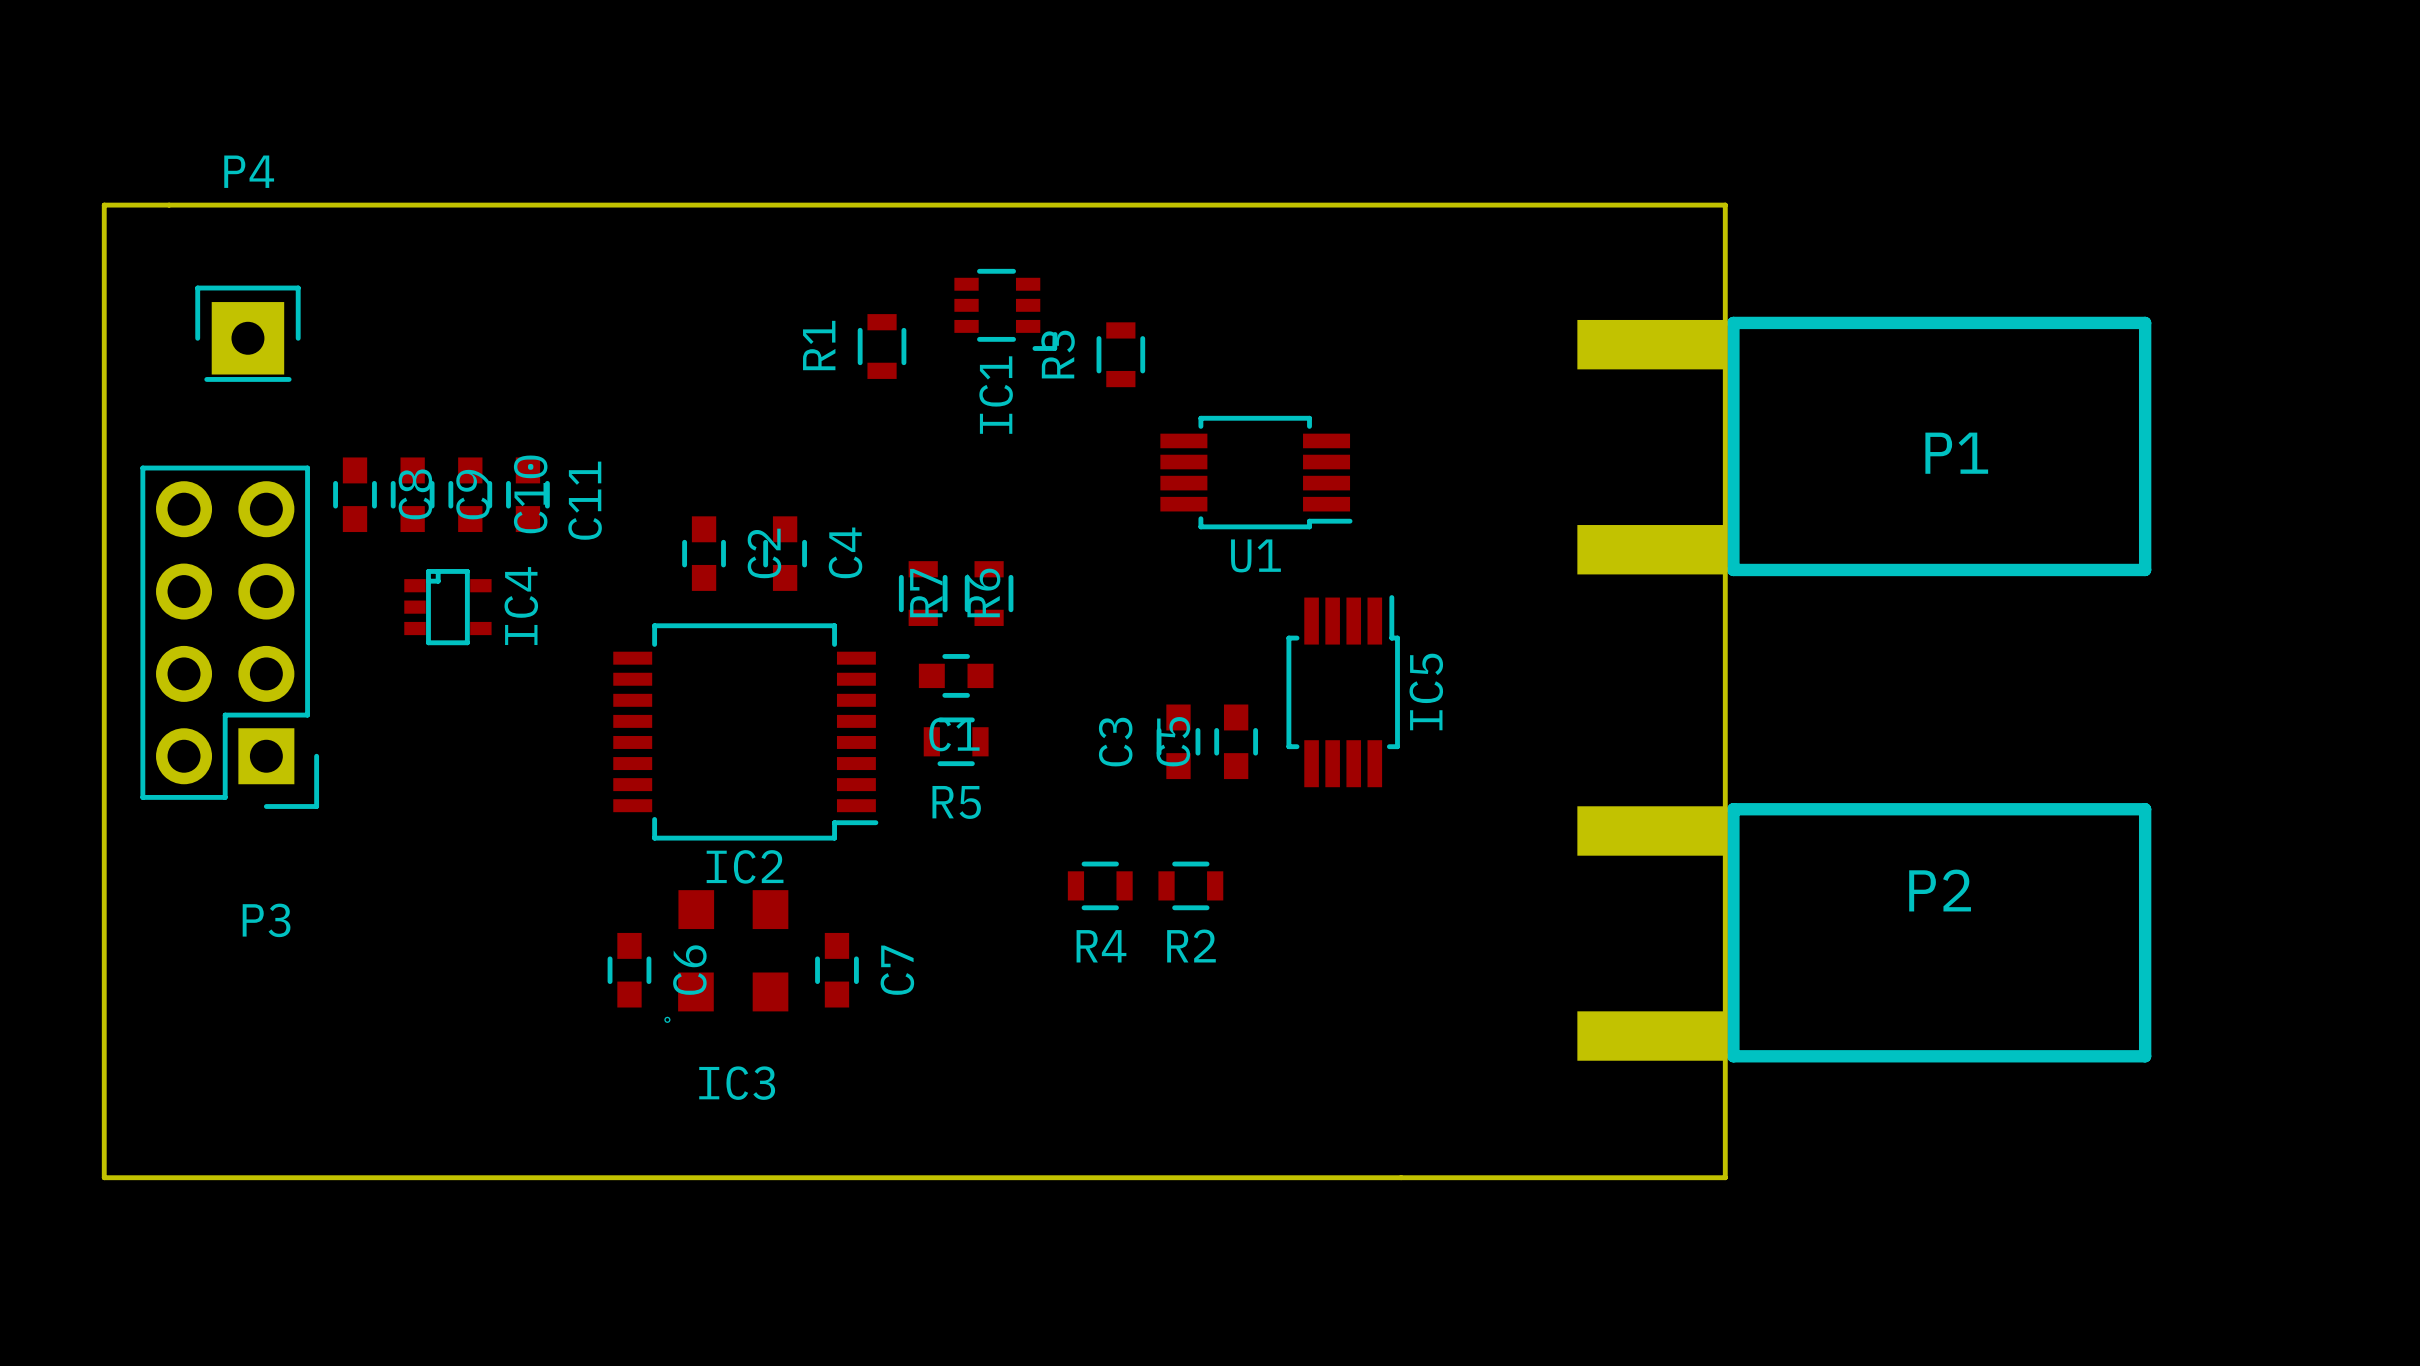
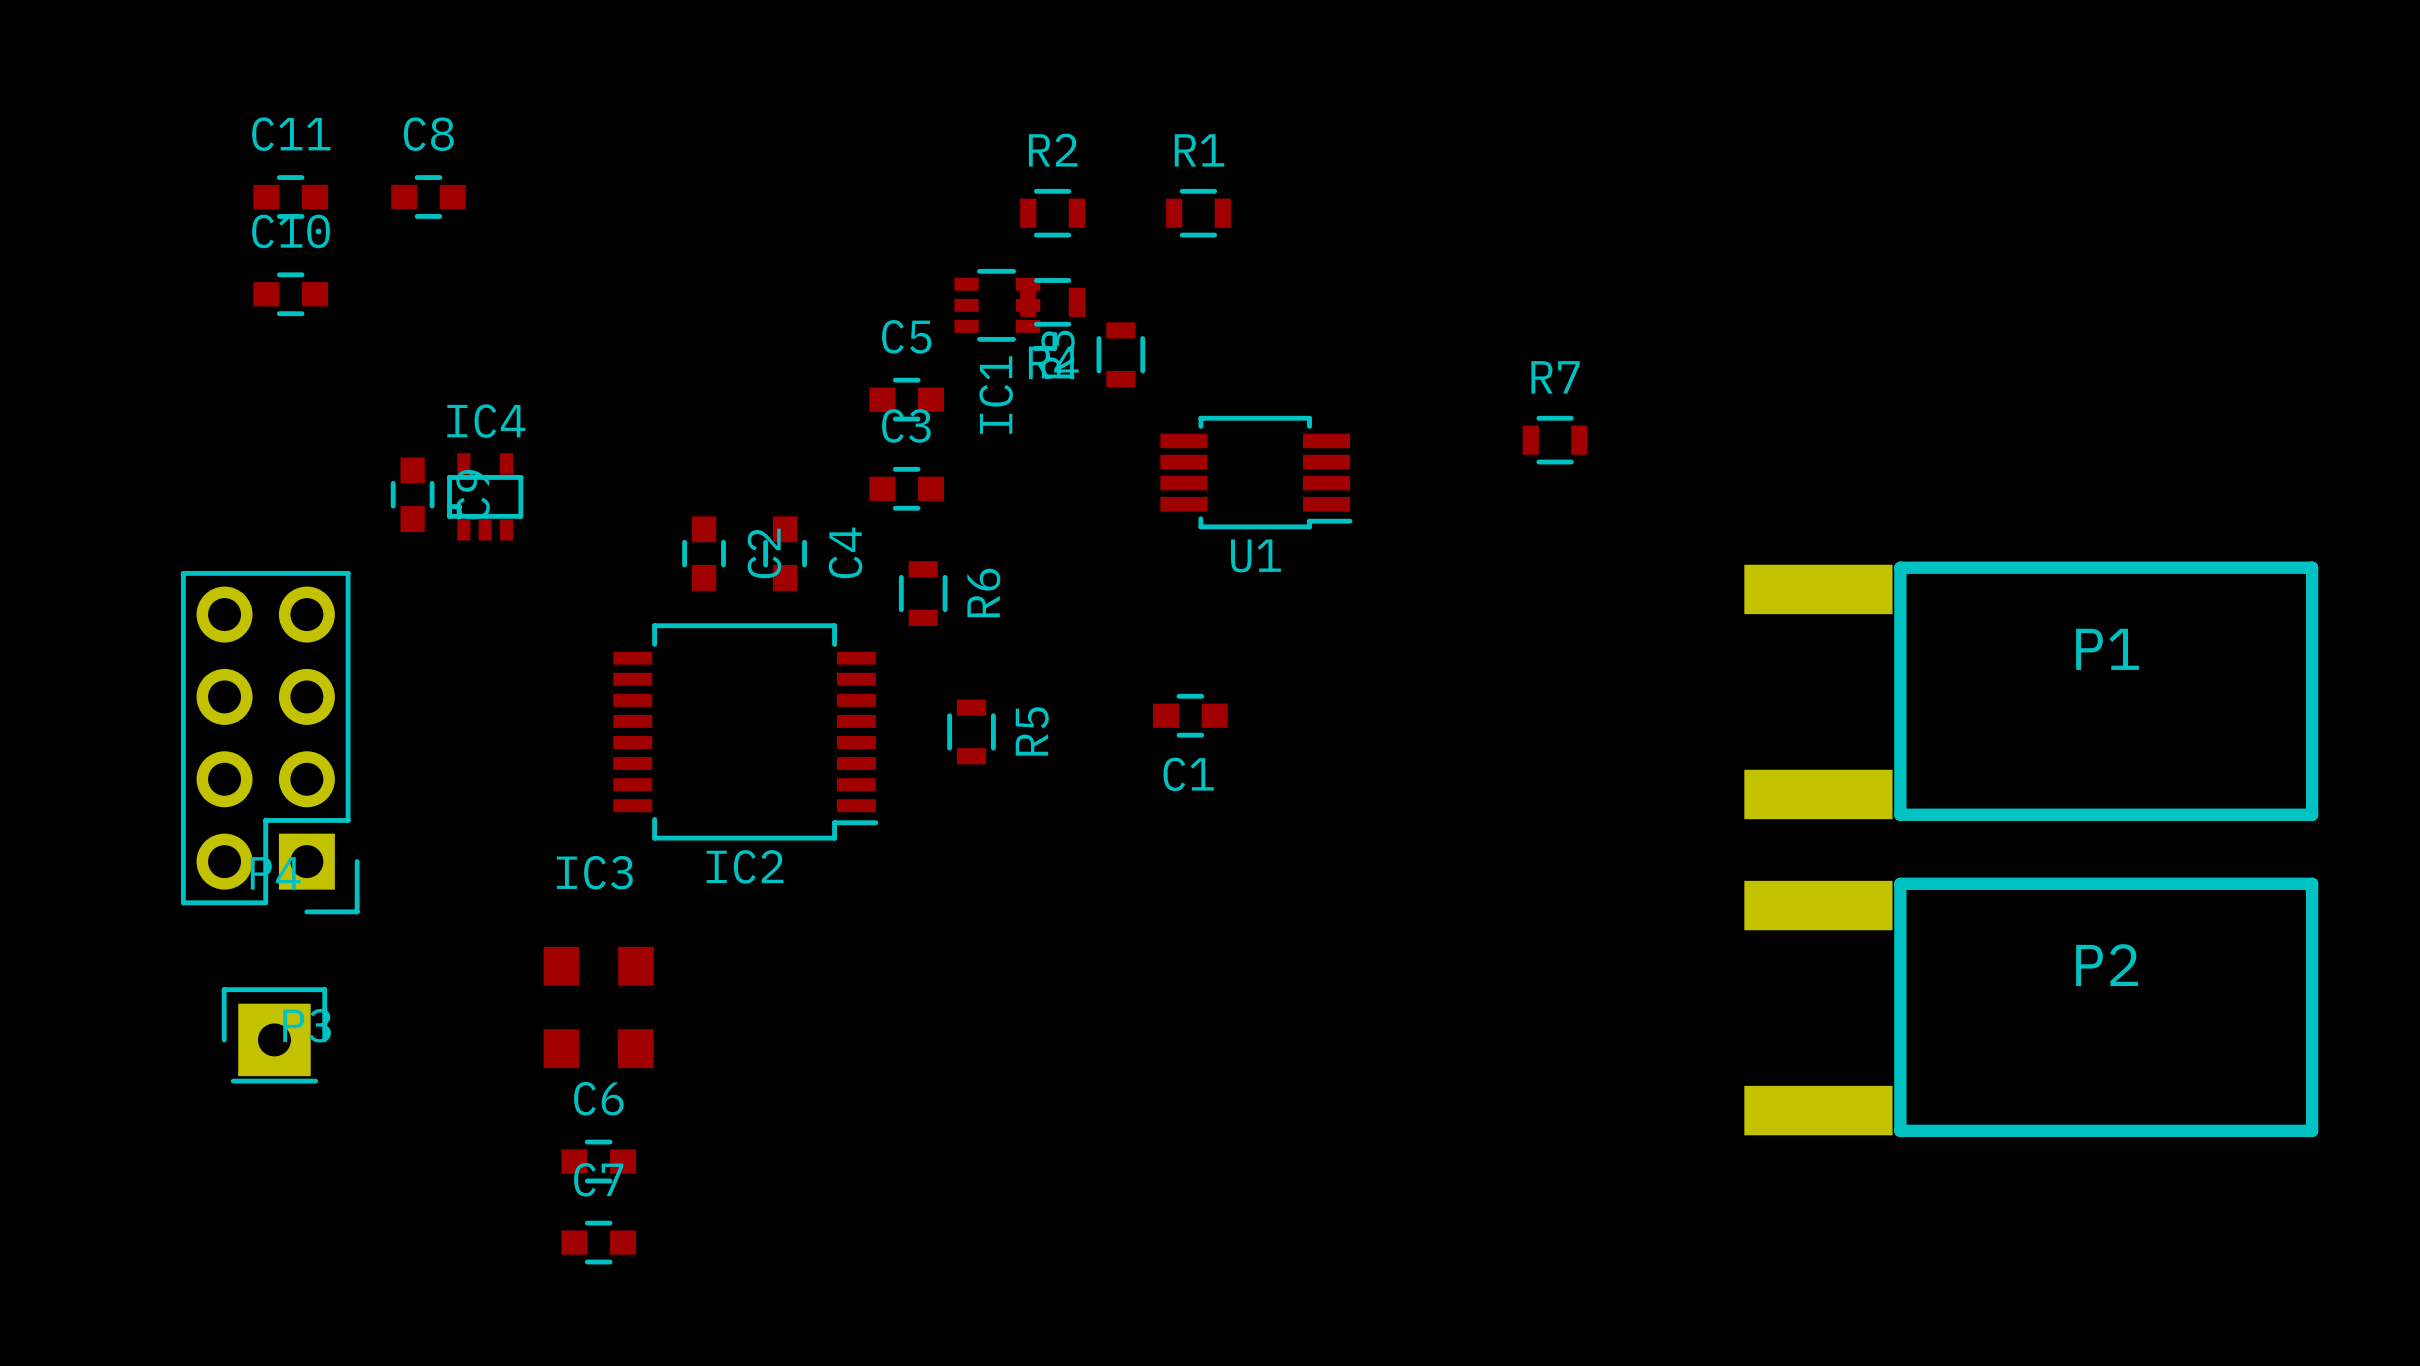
board edge: (104, 205) (104, 1177) (1725, 1177) (1725, 205) (104, 205) -> none
P4 position: (247, 333) -> (274, 1035)
R1 rotation: 0° (882, 346) -> 90° clockwise (1198, 213)
R1 position: (882, 346) -> (1198, 213)
P1 position: (1864, 446) -> (2031, 691)
P1 name position: P1 (1956, 453) -> P1 (2107, 649)
C8 rotation: 0° (355, 494) -> 90° clockwise (428, 196)
C8 position: (355, 494) -> (428, 196)
C8 name position: C8 (415, 494) -> C8 (428, 134)
C10 rotation: 0° (470, 494) -> 90° clockwise (290, 294)
C10 position: (470, 494) -> (290, 294)
C11 rotation: 0° (527, 494) -> 90° clockwise (290, 196)
C11 position: (527, 494) -> (290, 196)
C10 name position: C10 (530, 494) -> C10 (291, 231)
C11 name position: C11 (585, 500) -> C11 (291, 134)
R7 rotation: 0° (989, 593) -> 90° clockwise (1555, 440)
R7 position: (989, 593) -> (1555, 440)
IC4 rotation: 0° (447, 607) -> 90° counterclockwise (485, 496)
IC4 position: (447, 607) -> (485, 496)
P3 position: (229, 637) -> (270, 742)
C1 position: (956, 675) -> (1190, 715)
IC5: (1343, 691) -> none
R5 rotation: 0° (956, 741) -> 90° clockwise (971, 731)
C3 rotation: 0° (1178, 741) -> 90° clockwise (906, 488)
C3 position: (1178, 741) -> (906, 488)
C5 rotation: 0° (1236, 741) -> 90° clockwise (906, 399)
C5 position: (1236, 741) -> (906, 399)
R5 name position: R5 (956, 802) -> R5 (1032, 731)
R4 position: (1100, 885) -> (1052, 302)
R2 position: (1190, 885) -> (1052, 213)
IC3 footprint: [664, 890, 789, 1023] -> [543, 946, 654, 1069]
P2 position: (1864, 932) -> (2031, 1007)
R2 name position: R2 (1191, 946) -> R2 (1053, 150)
C6 rotation: 0° (629, 970) -> 90° clockwise (598, 1161)
C6 position: (629, 970) -> (598, 1161)
C6 name position: C6 (689, 970) -> C6 (598, 1098)
C7 rotation: 0° (836, 970) -> 90° clockwise (598, 1242)
C7 position: (836, 970) -> (598, 1242)
C7 name position: C7 (897, 970) -> C7 (598, 1179)
IC3 name position: IC3 (737, 1083) -> IC3 (594, 872)

